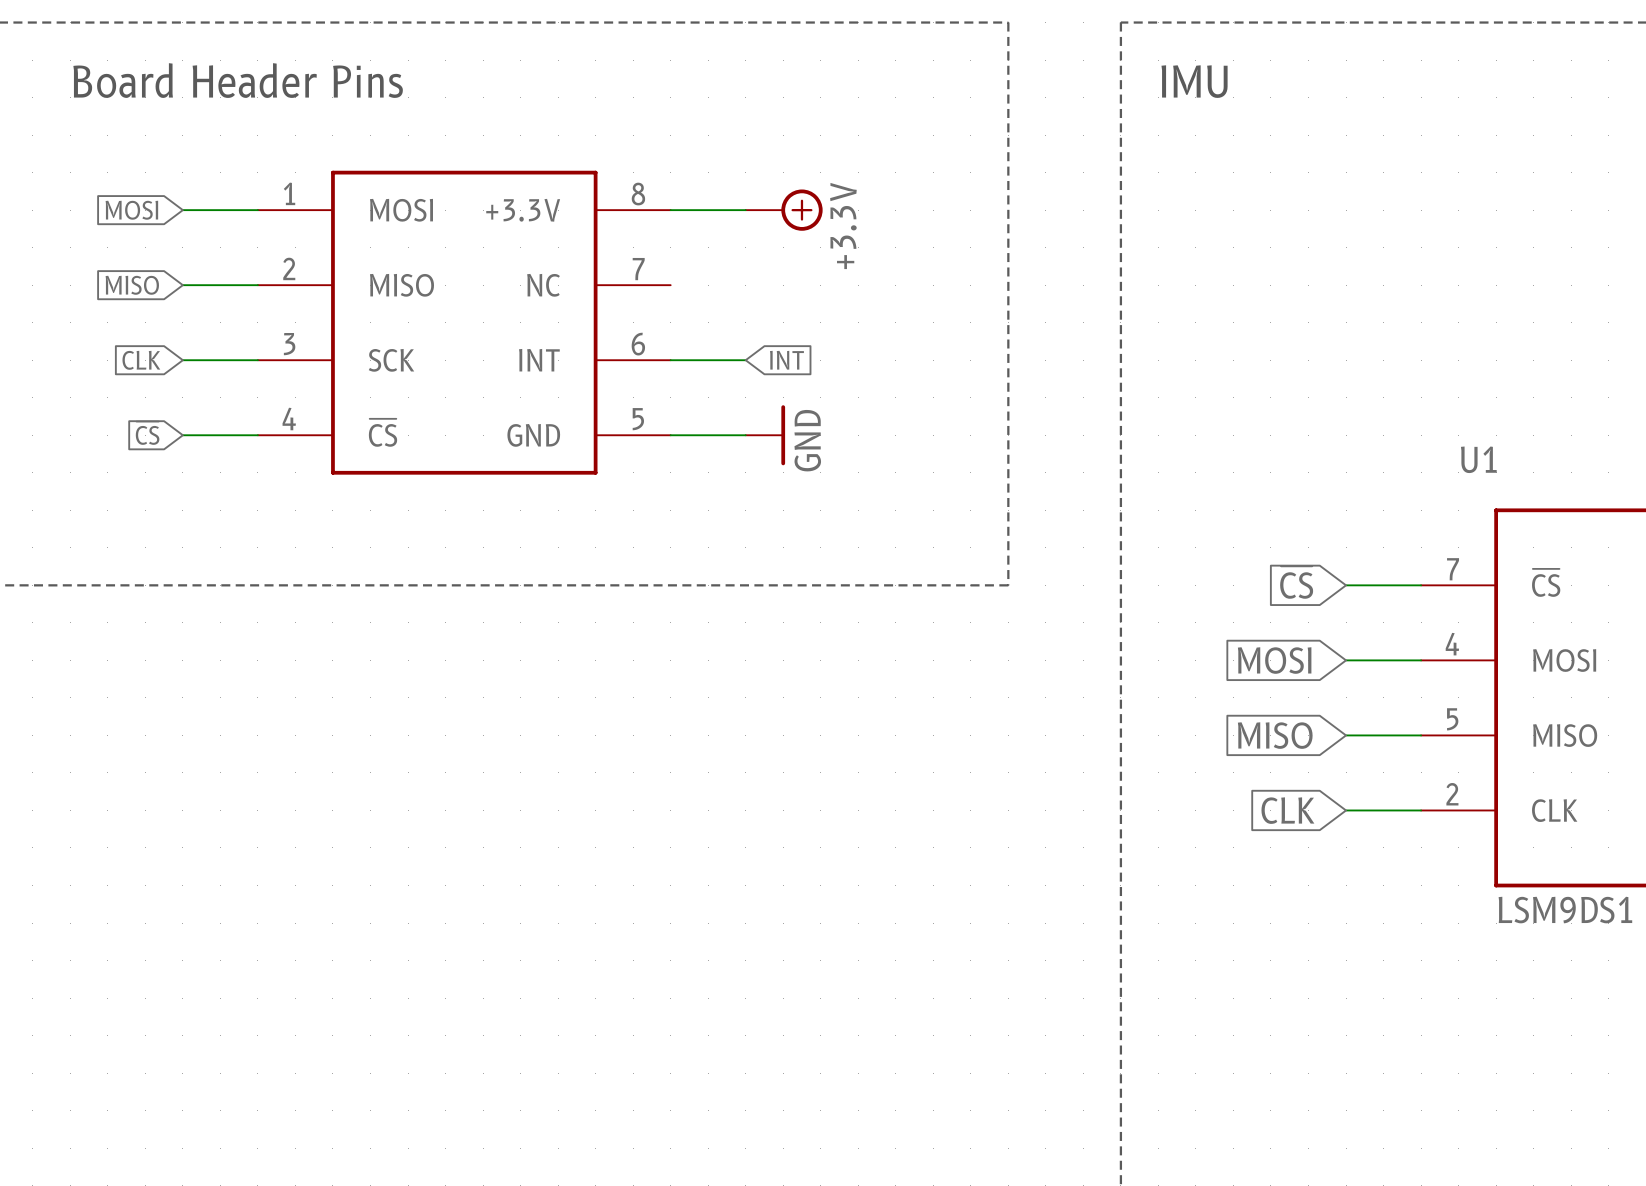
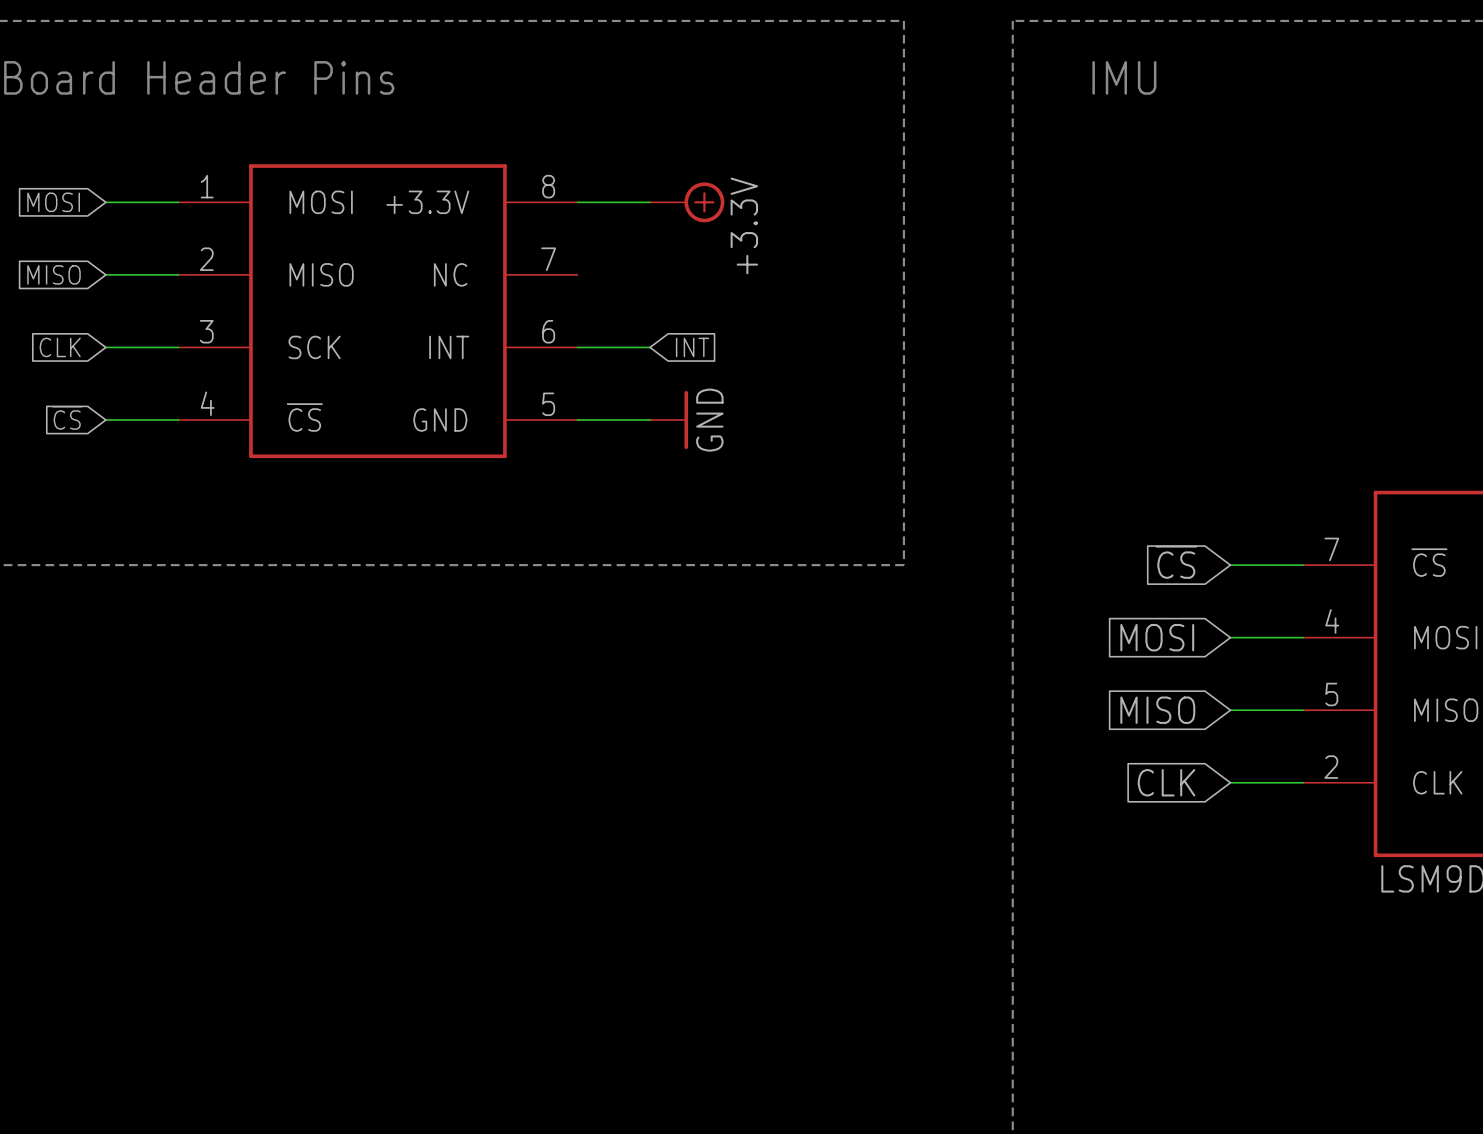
text position: IMU (1194, 81) -> IMU (1124, 77)
U1 name: U1 (1478, 459) -> none

